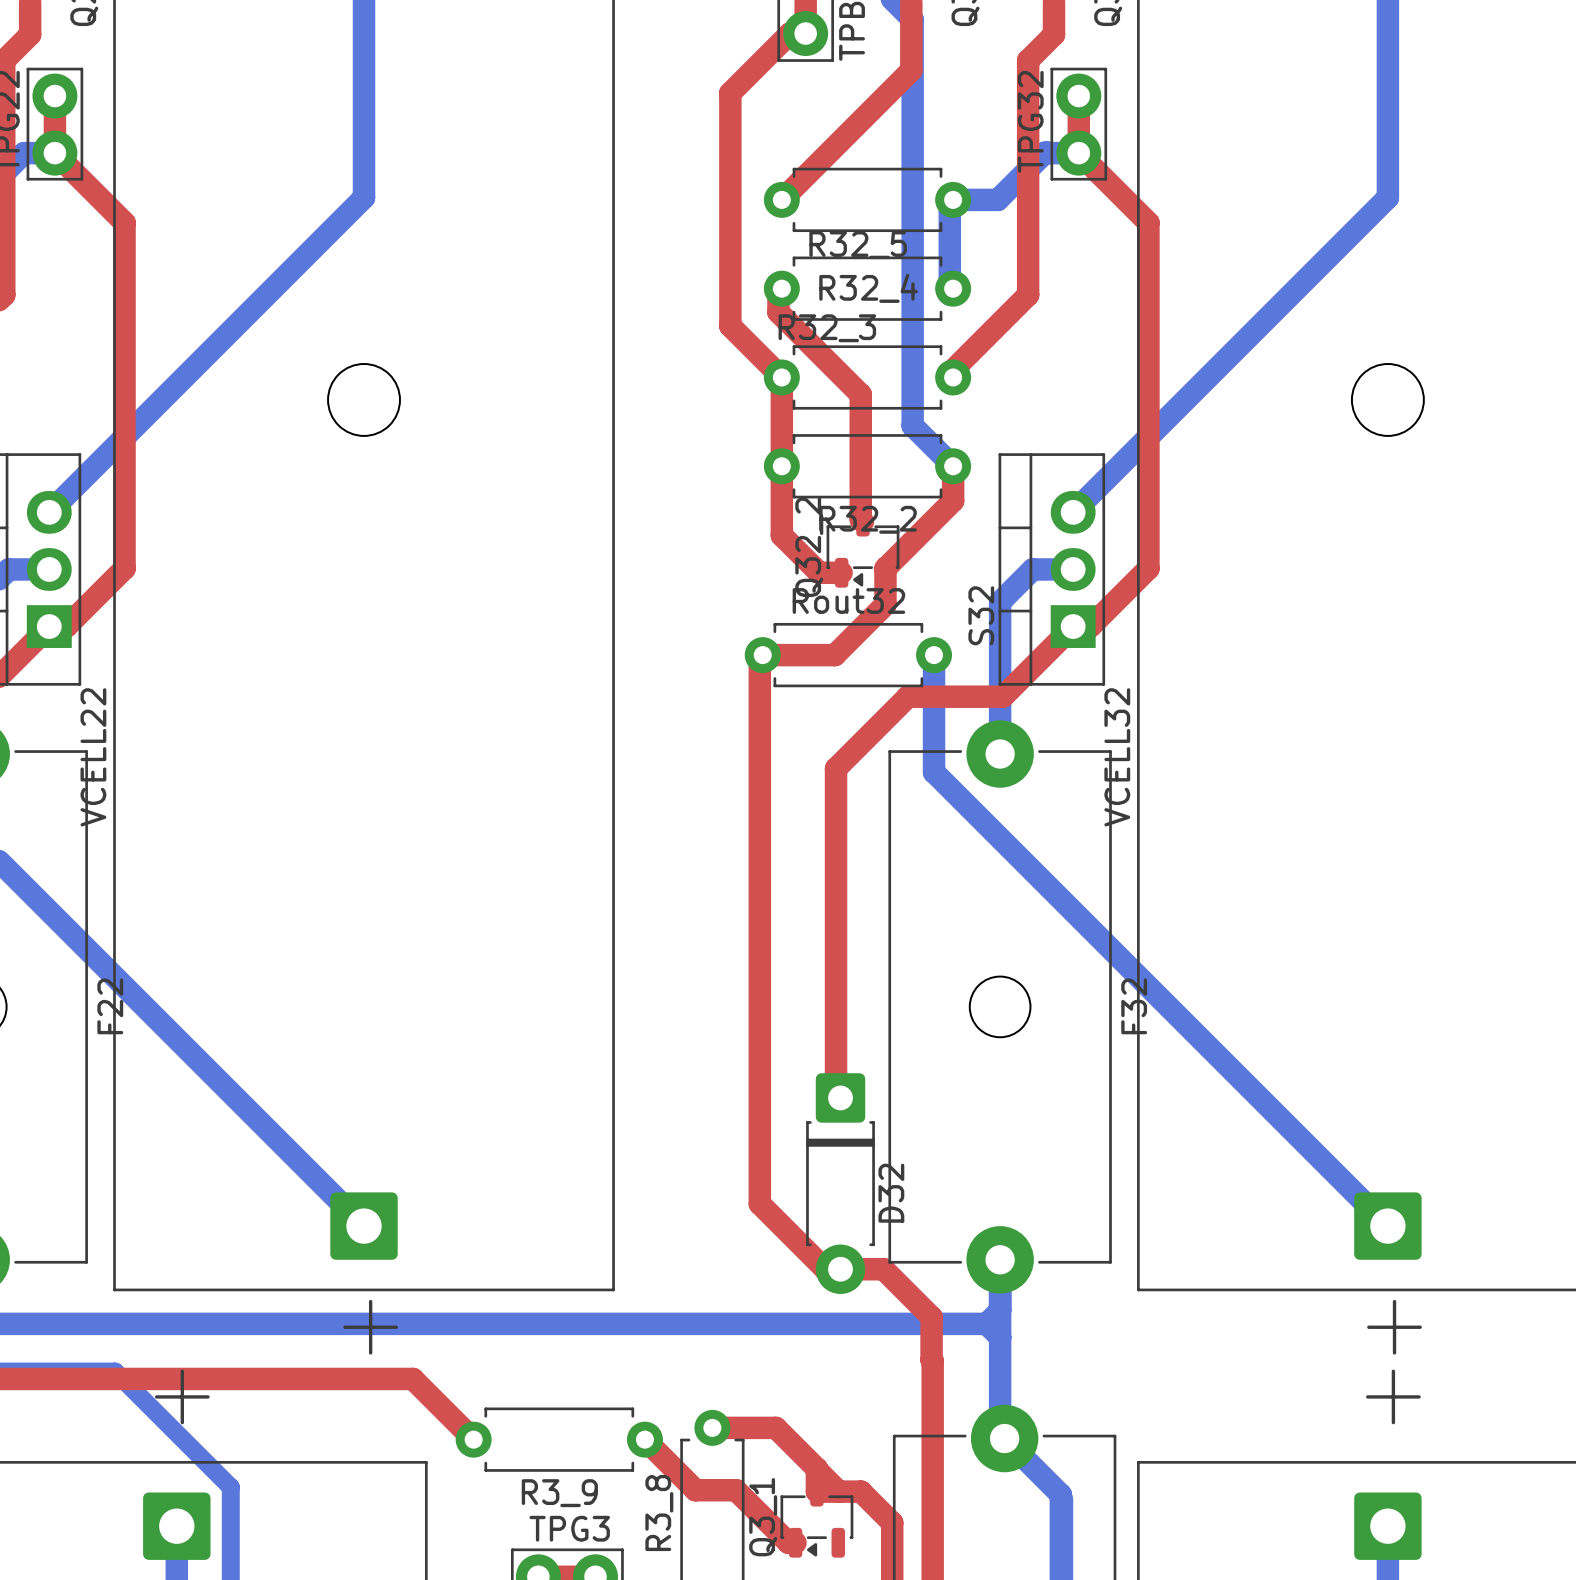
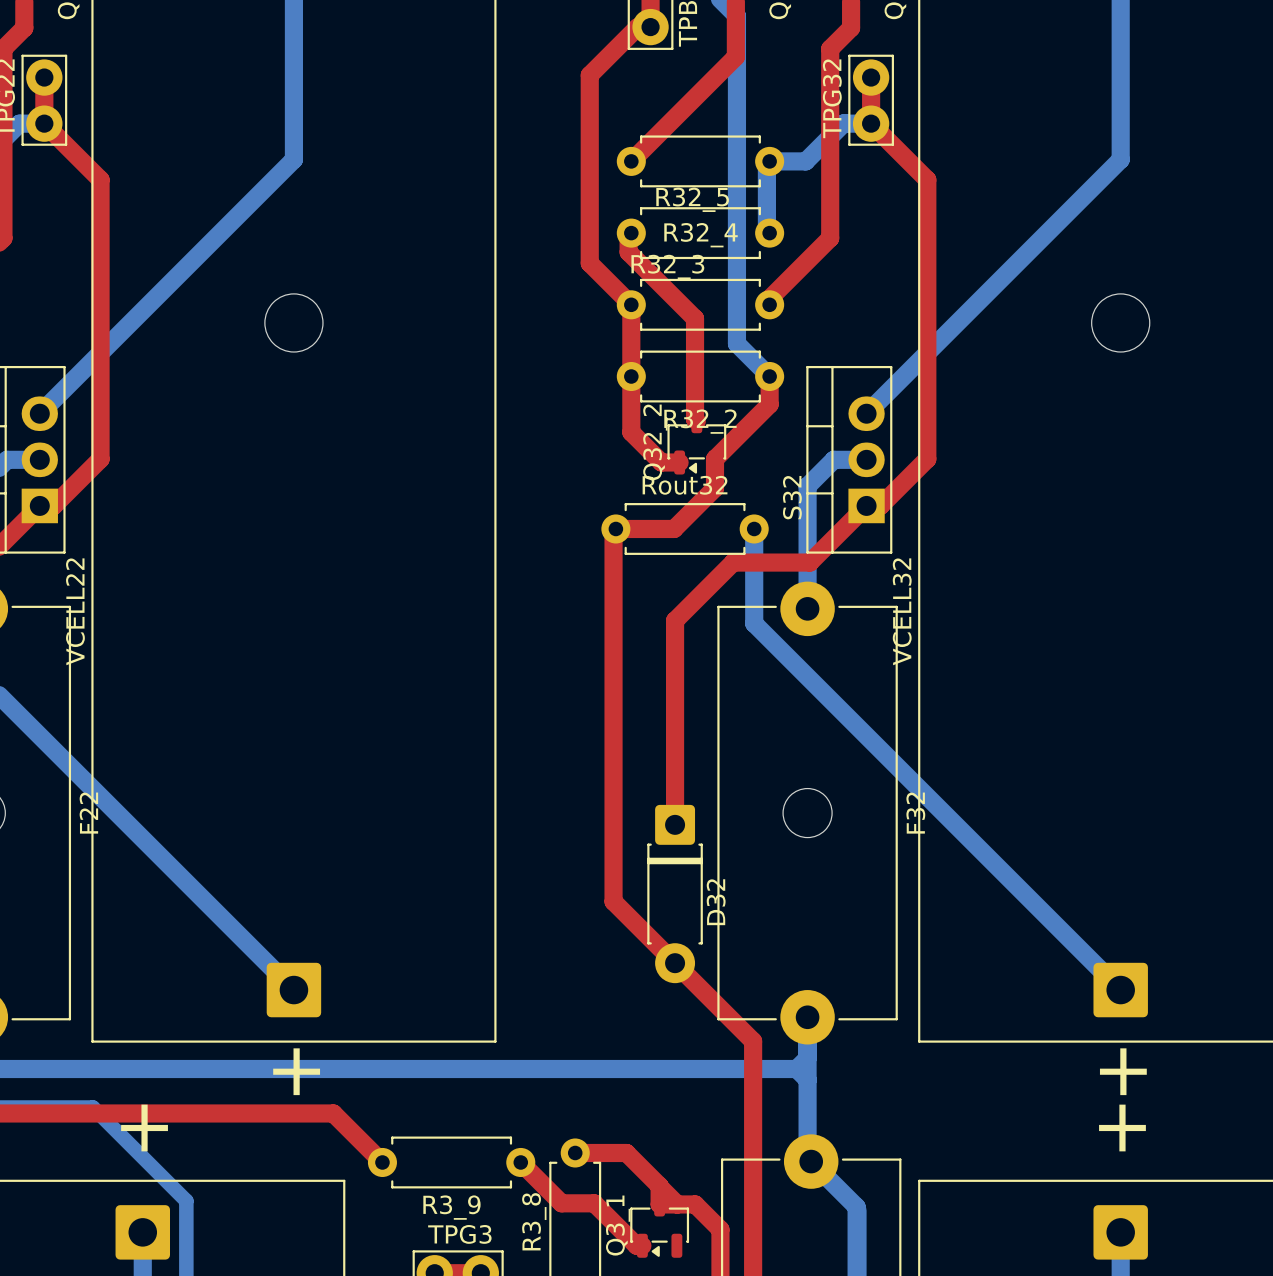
top track: (836, 1021) (836, 1093) (840, 1097) -> none
top track: (759, 1116) (759, 1203) (825, 1269) (883, 1269) (931, 1317) (932, 1360) -> (613, 901) (753, 1041) (753, 1098)
D32 position: (840, 1183) -> (675, 894)

